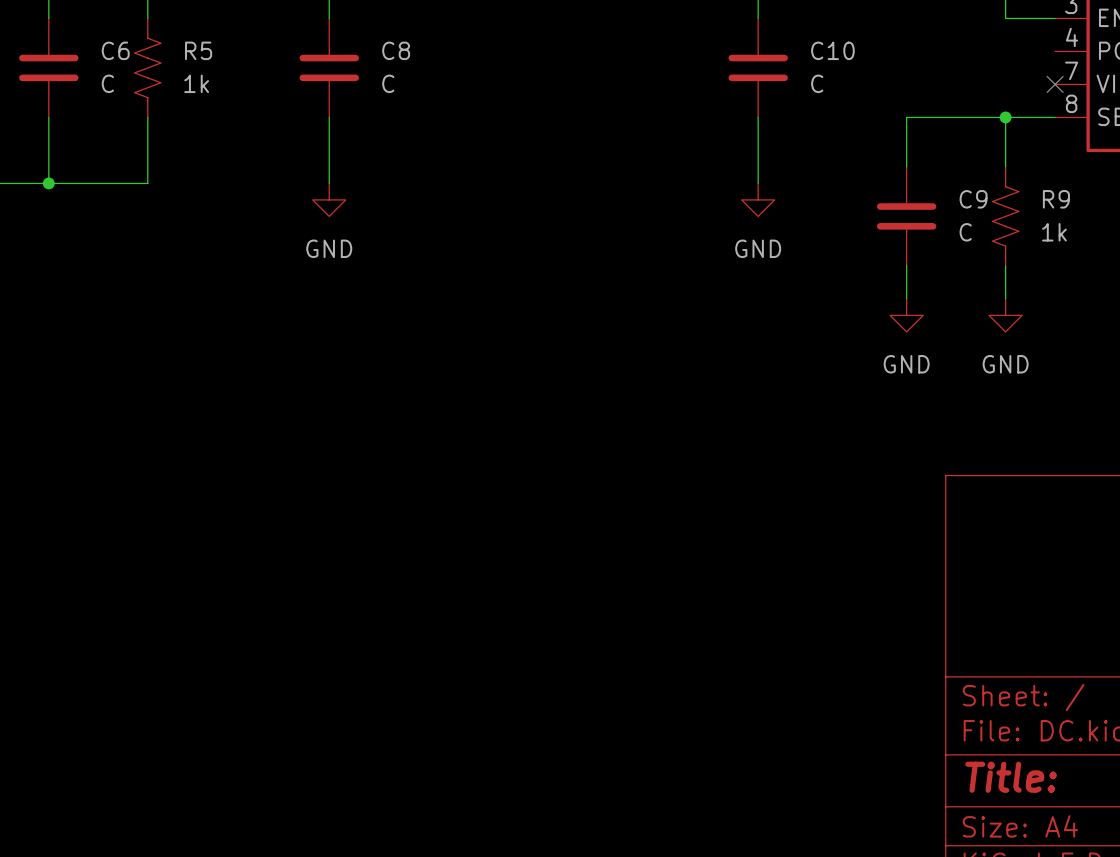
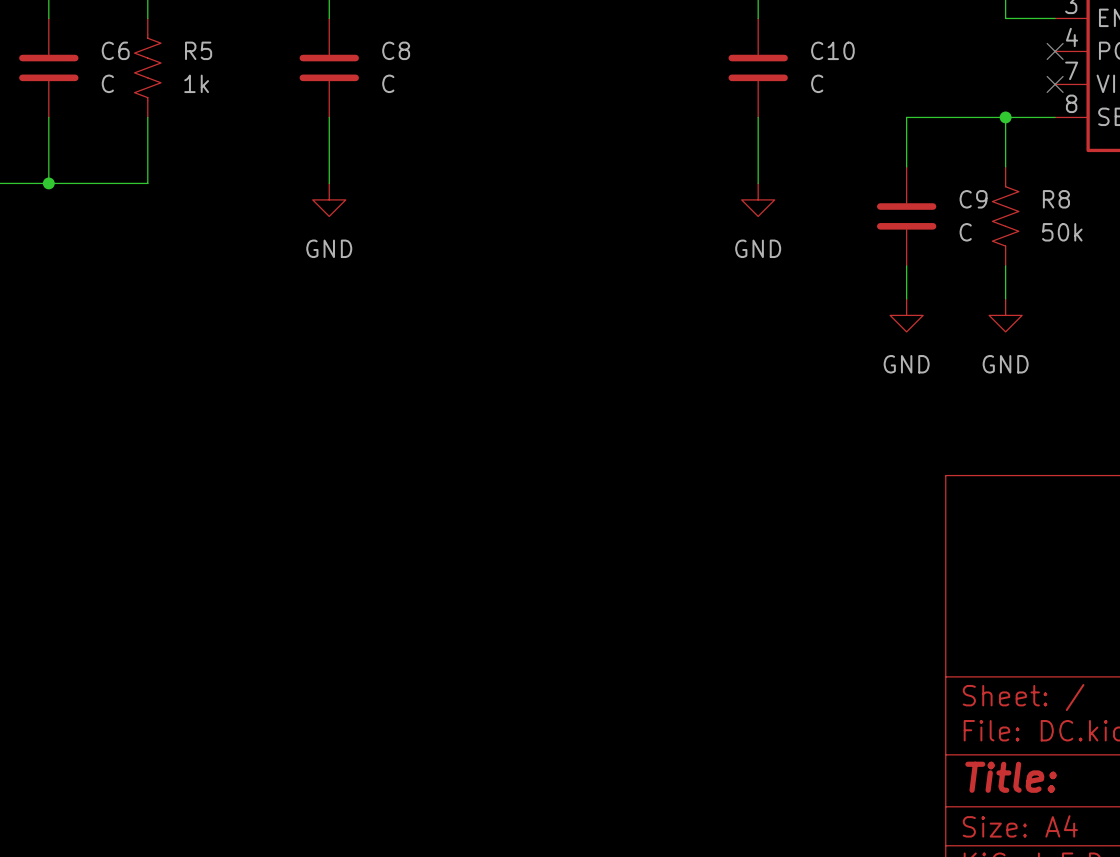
no-connect mark: none -> (1055, 51)
R9 name: R9 (1056, 199) -> R8 (1056, 199)
R9 value: 1k (1054, 232) -> 50k (1062, 232)

